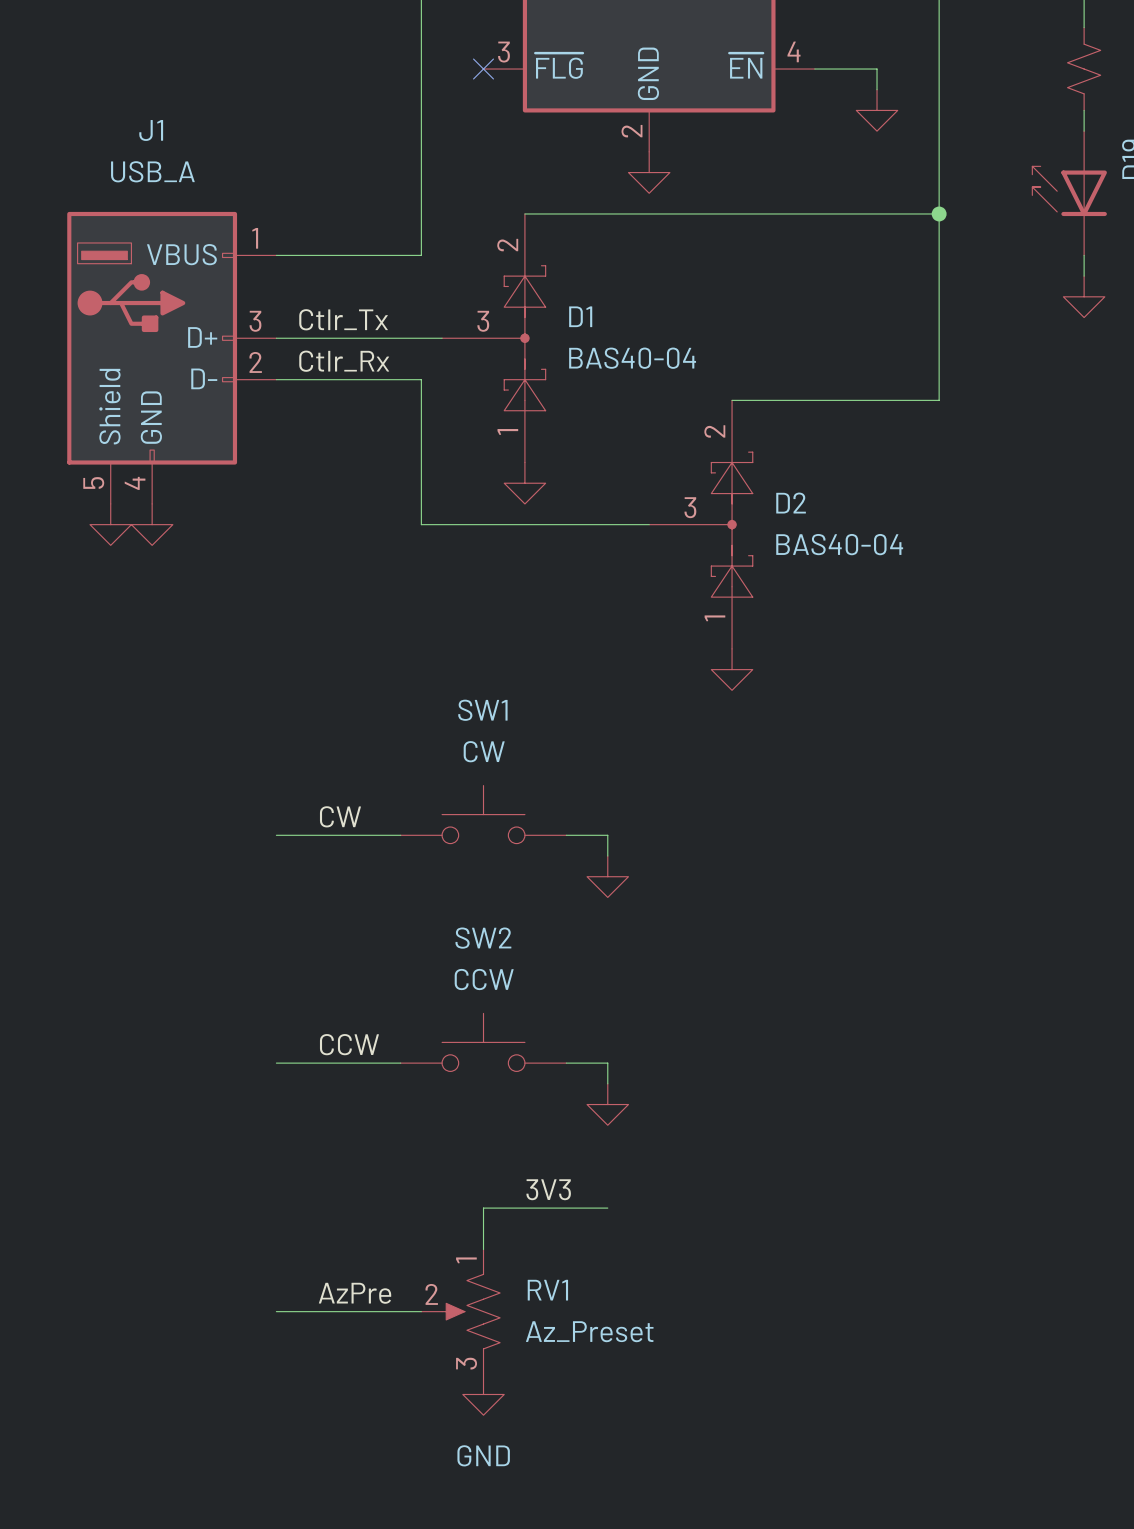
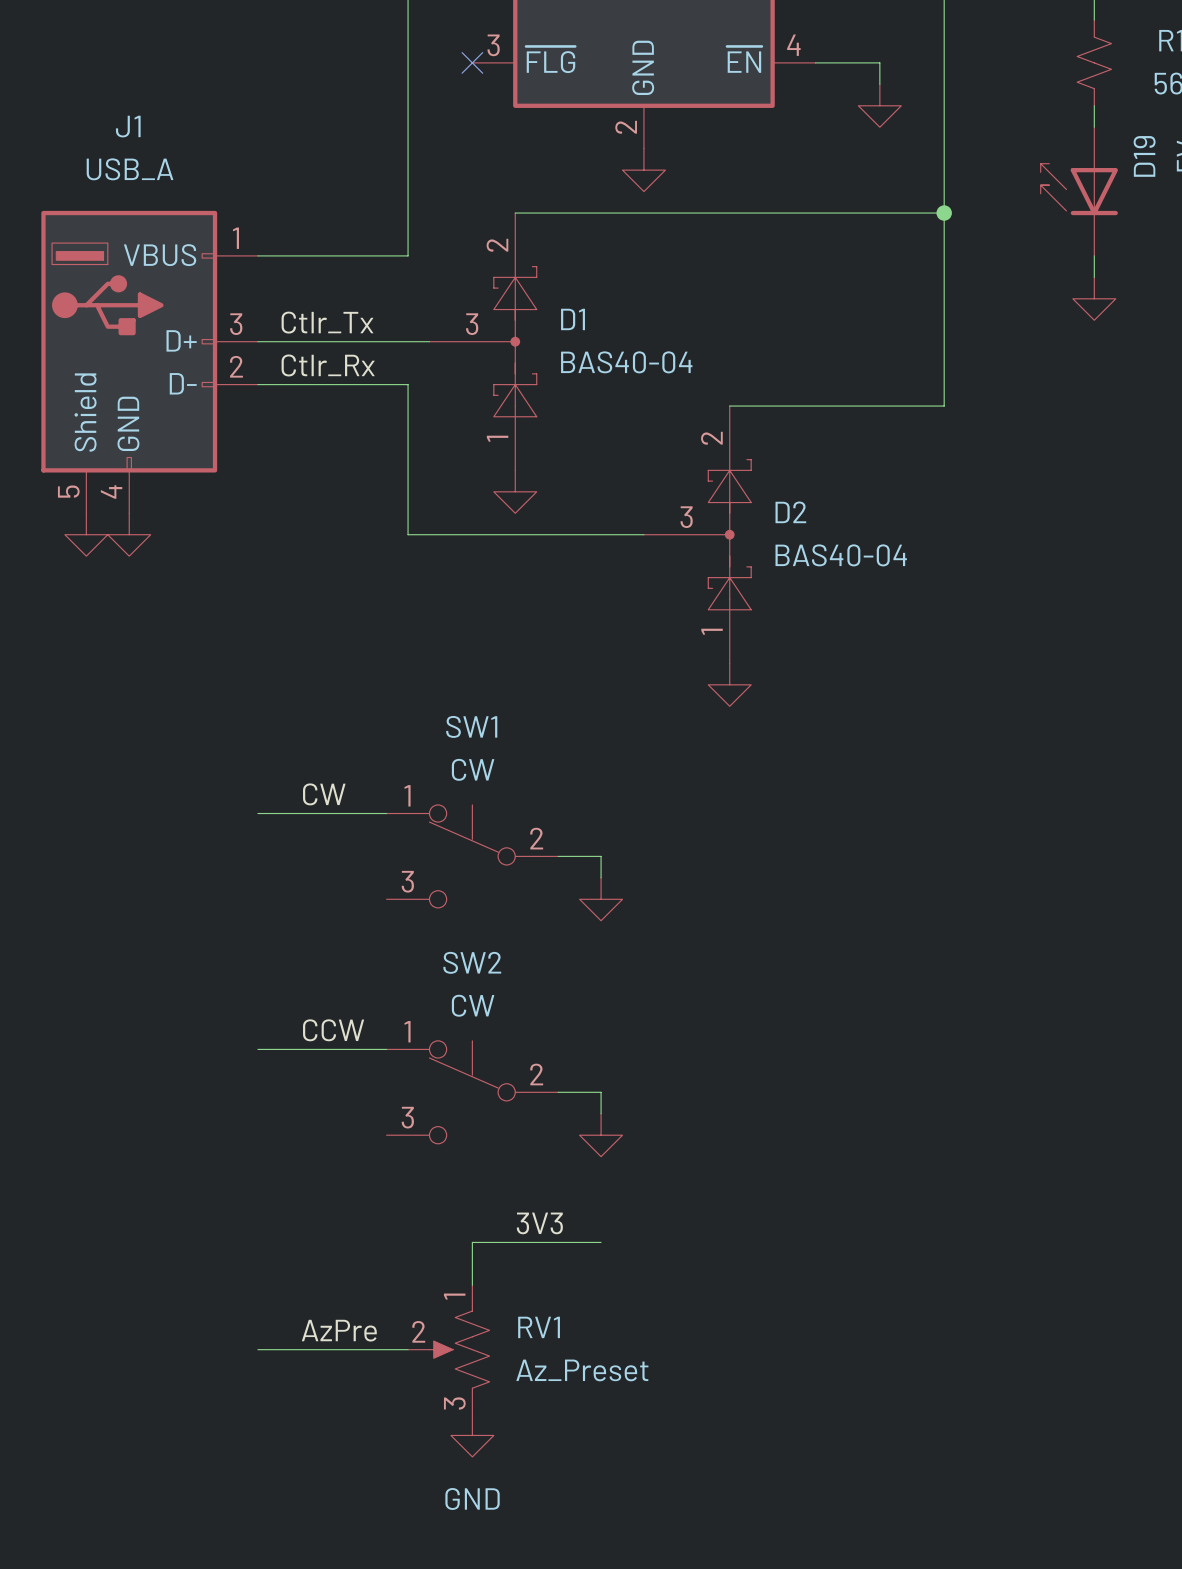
SW1 symbol: [400, 785, 567, 844] -> [386, 804, 559, 908]
label position: CW (340, 816) -> CW (324, 794)
wire: (276, 835) (400, 835) -> (257, 813) (386, 813)
SW2 value: CCW (484, 979) -> CW (473, 1005)
SW2 symbol: [400, 1013, 567, 1072] -> [386, 1040, 559, 1144]
label position: CCW (349, 1044) -> CCW (333, 1030)
wire: (276, 1063) (400, 1063) -> (257, 1049) (386, 1049)

